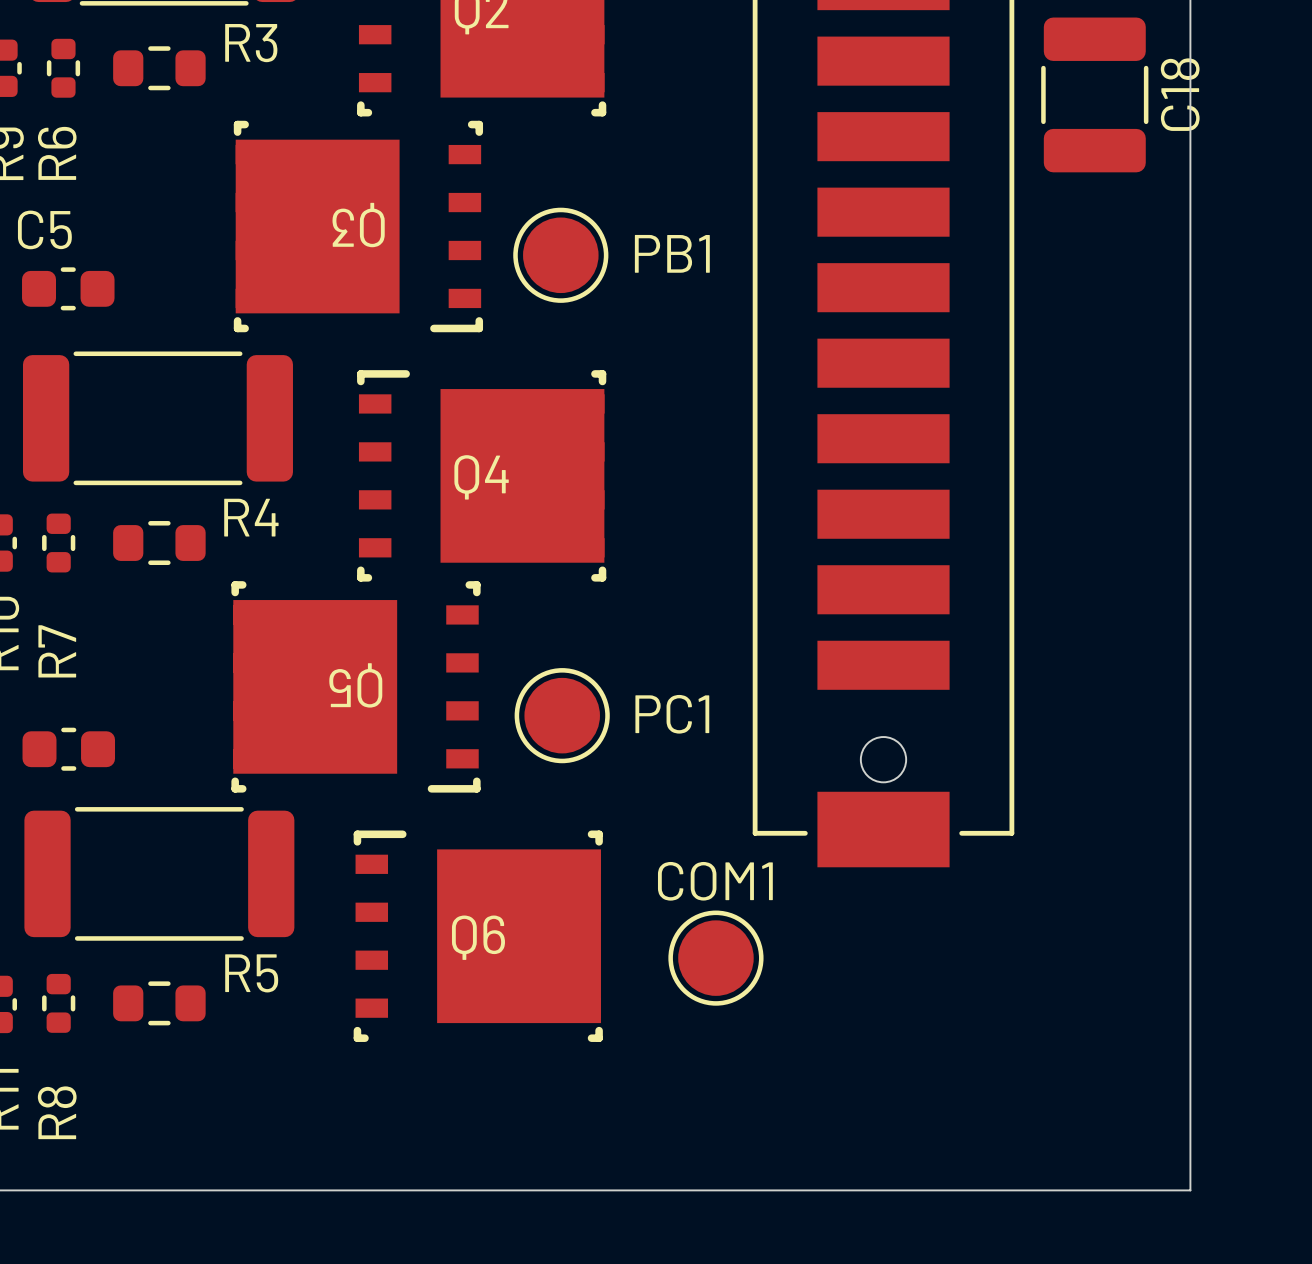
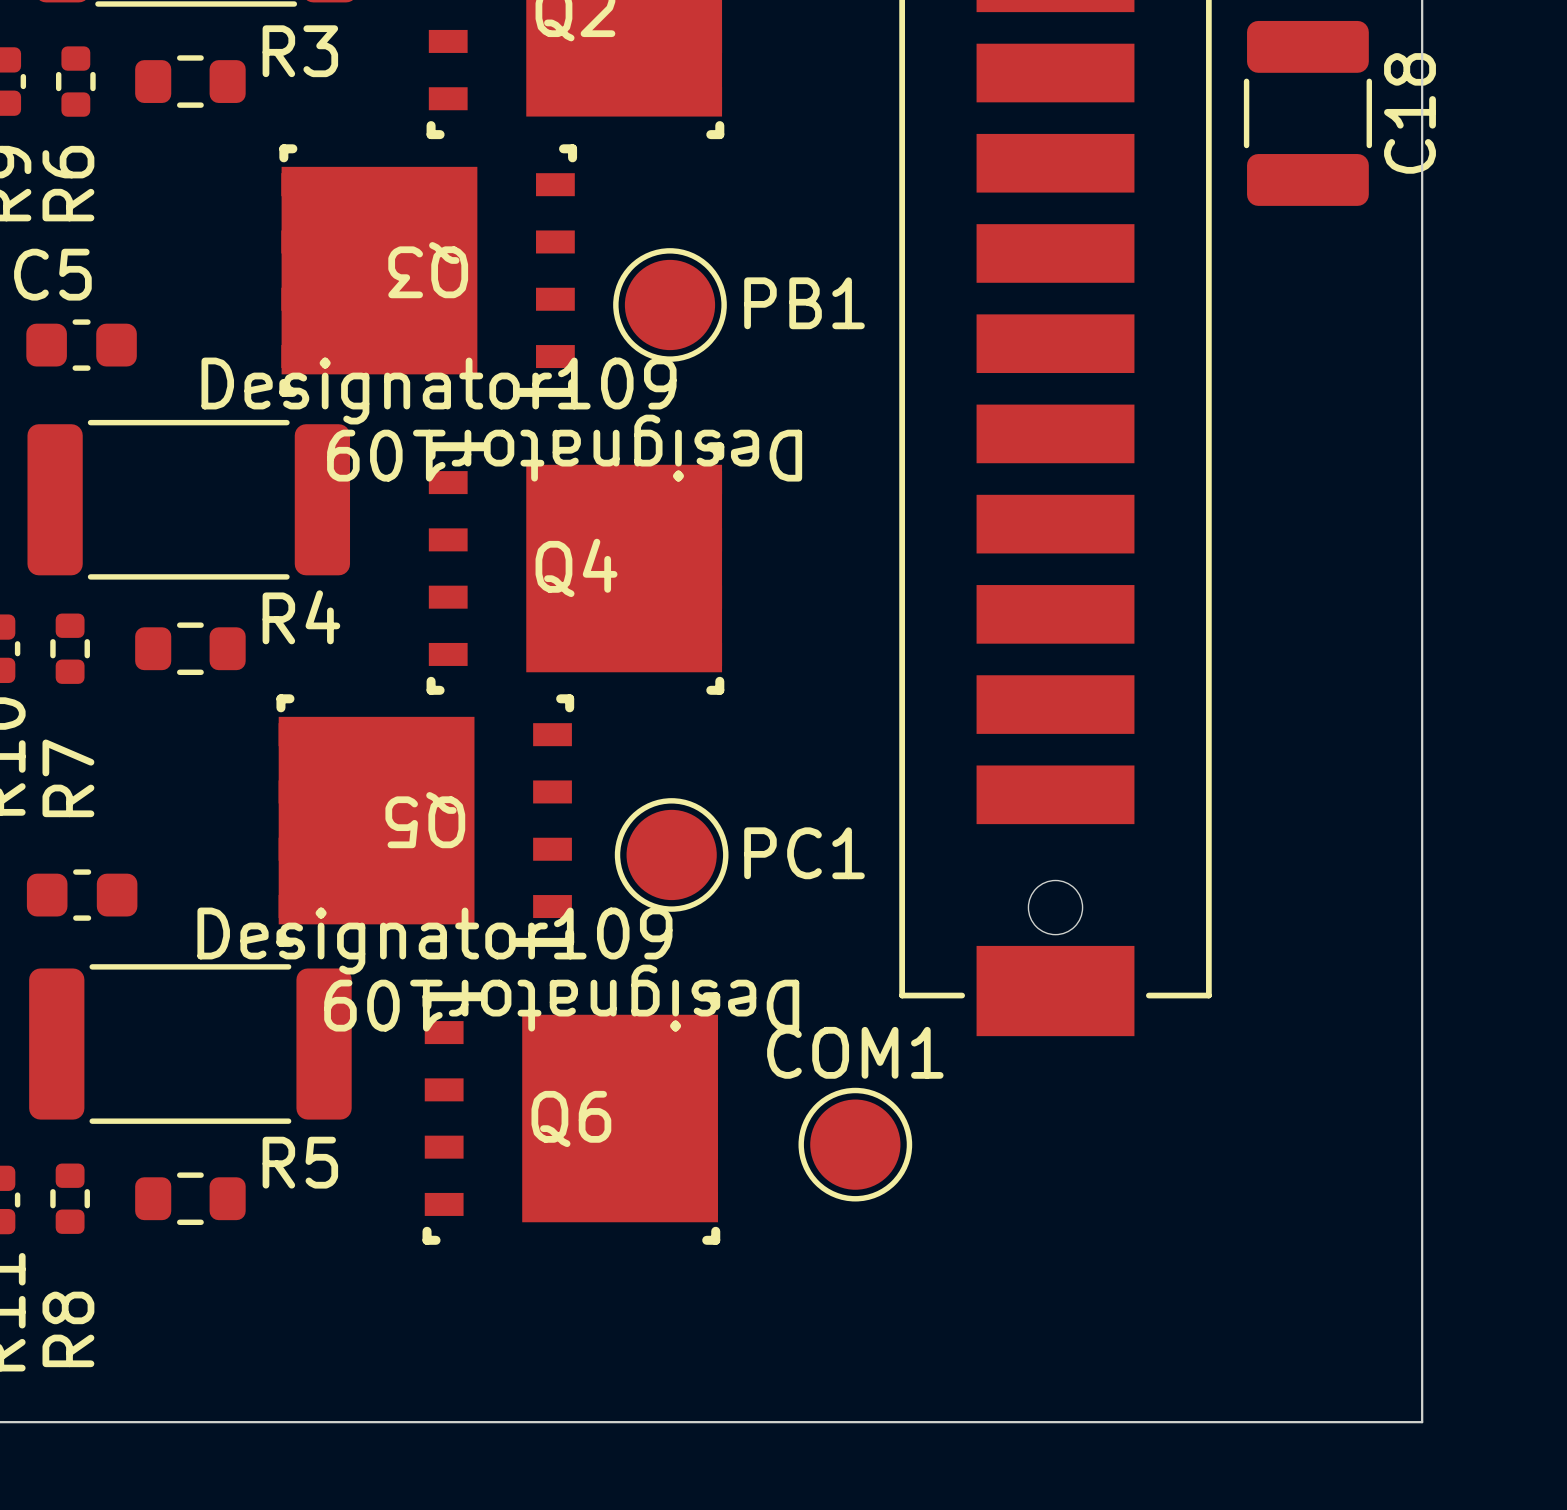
Q4 text: none -> Designator109 (439, 391)
Q3 text: none -> Designator109 (564, 448)
Q6 text: none -> Designator109 (434, 941)
Q5 text: none -> Designator109 (561, 998)

